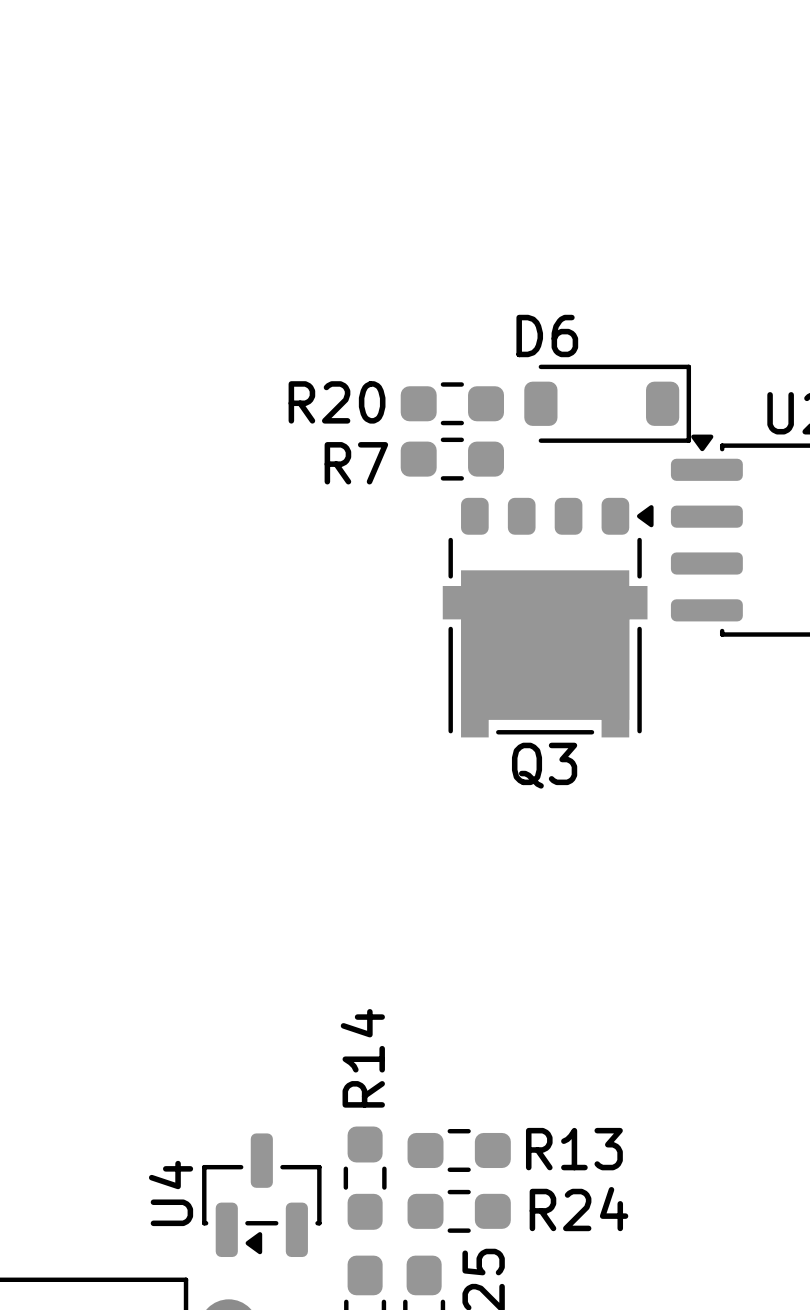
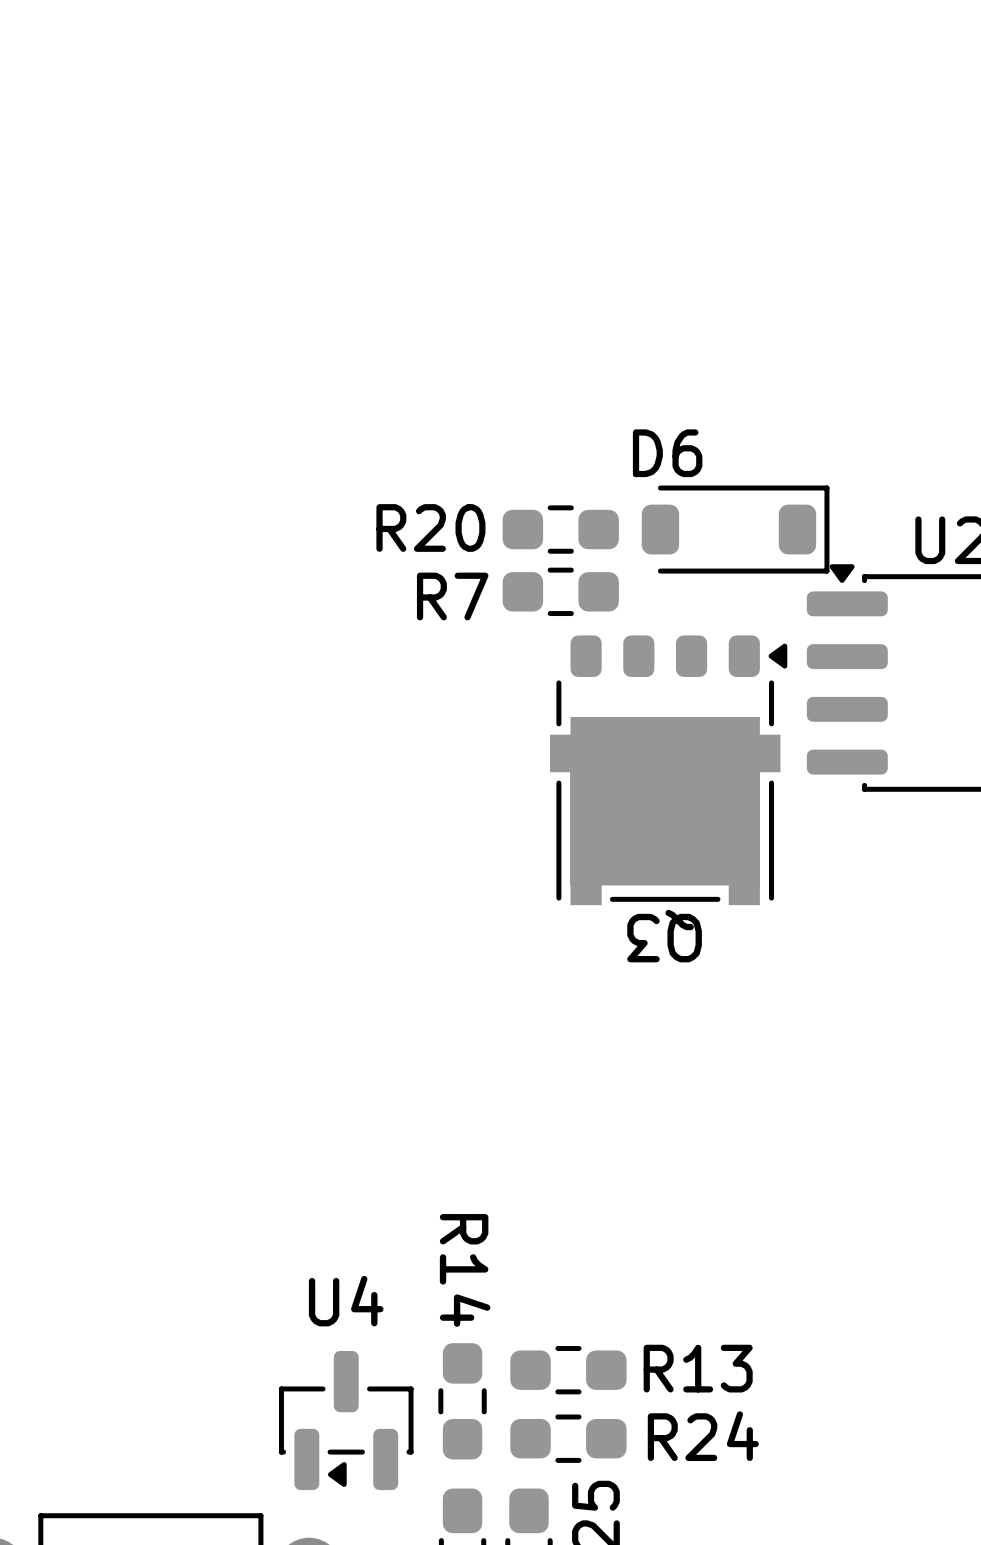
Q3 name rotation: 0° (544, 765) -> 180° (664, 936)
R14 name rotation: 0° (362, 1058) -> 180° (465, 1270)
U4 name rotation: 0° (171, 1193) -> 90° clockwise (346, 1301)
U4 name position: U4 (171, 1193) -> U4 (346, 1301)

